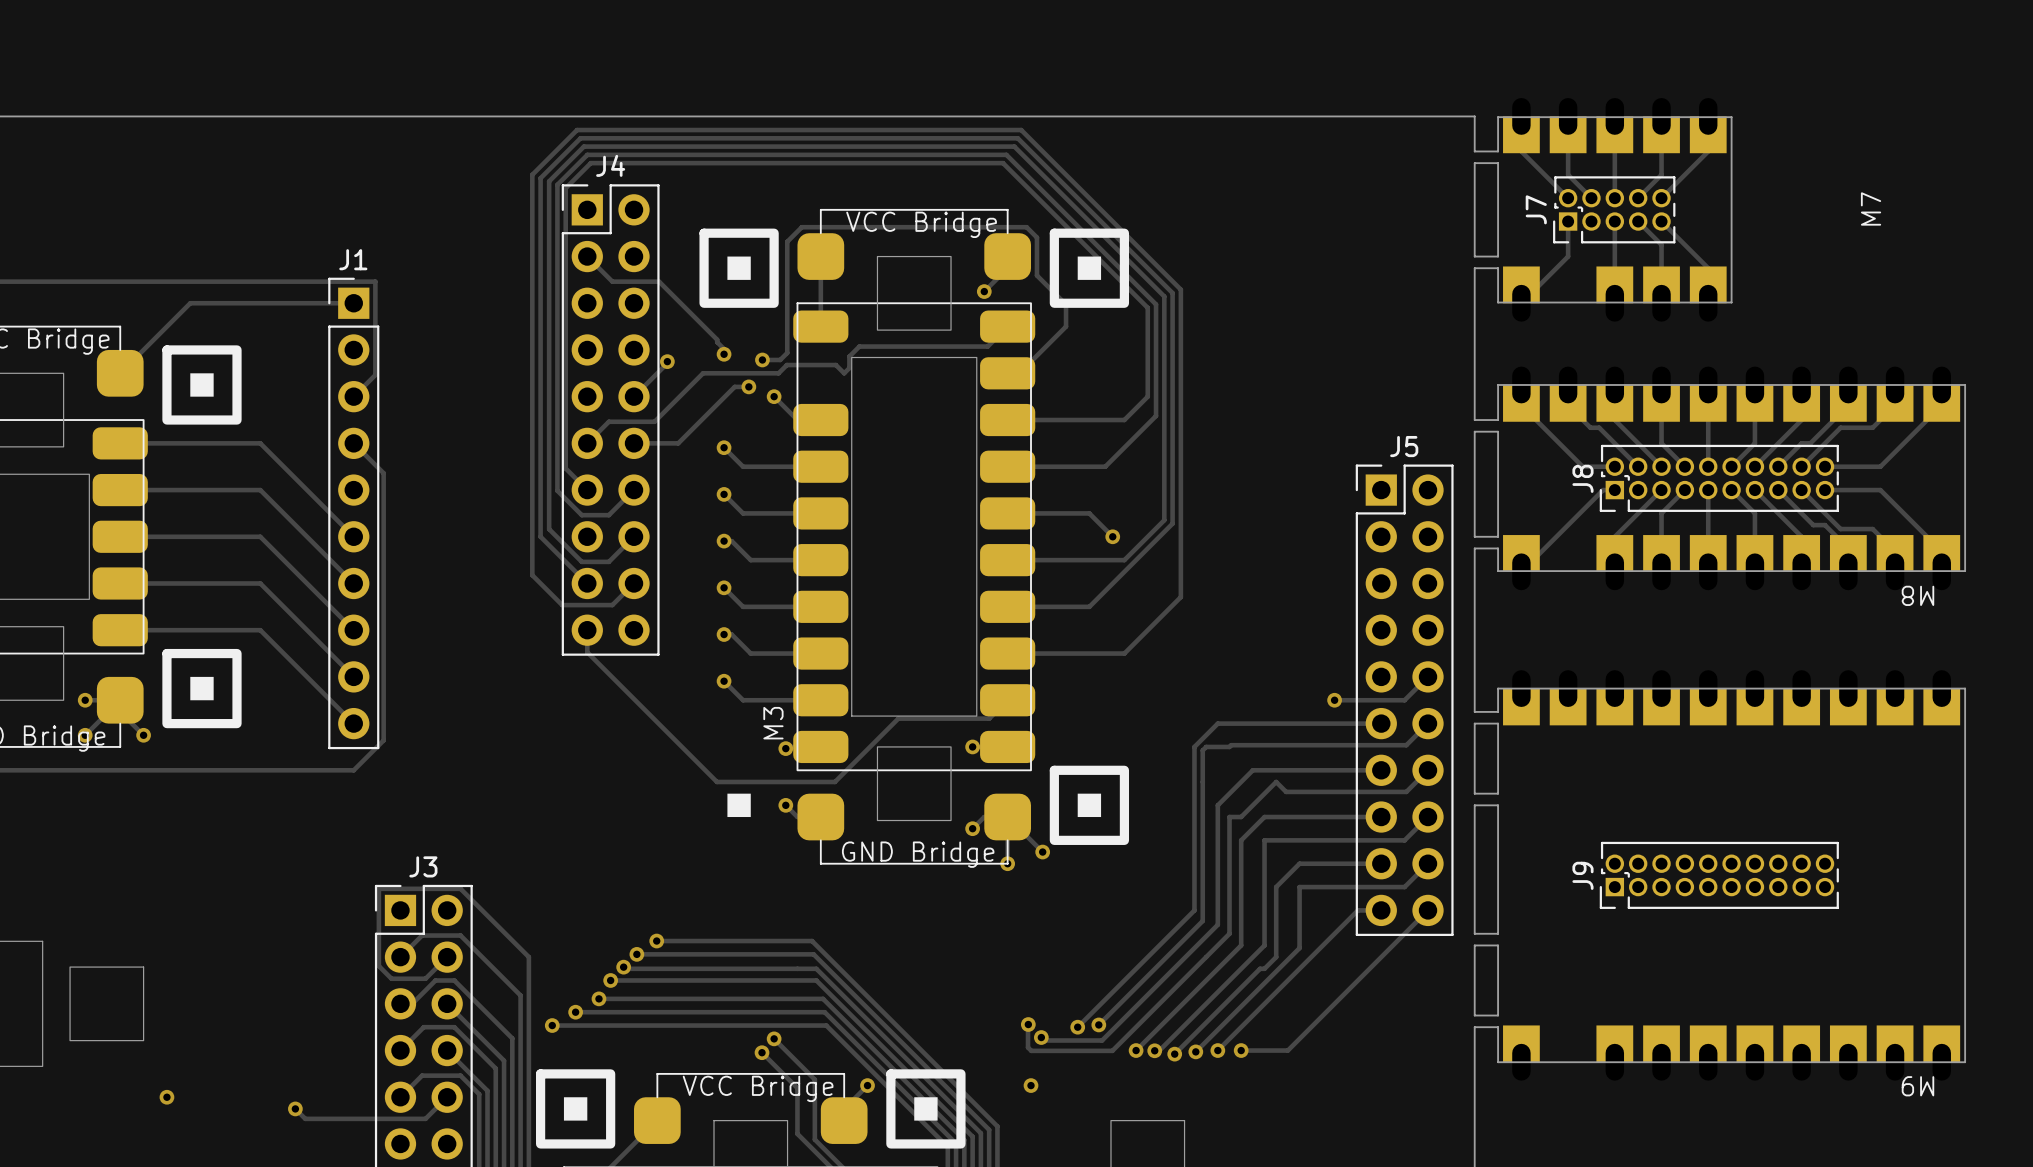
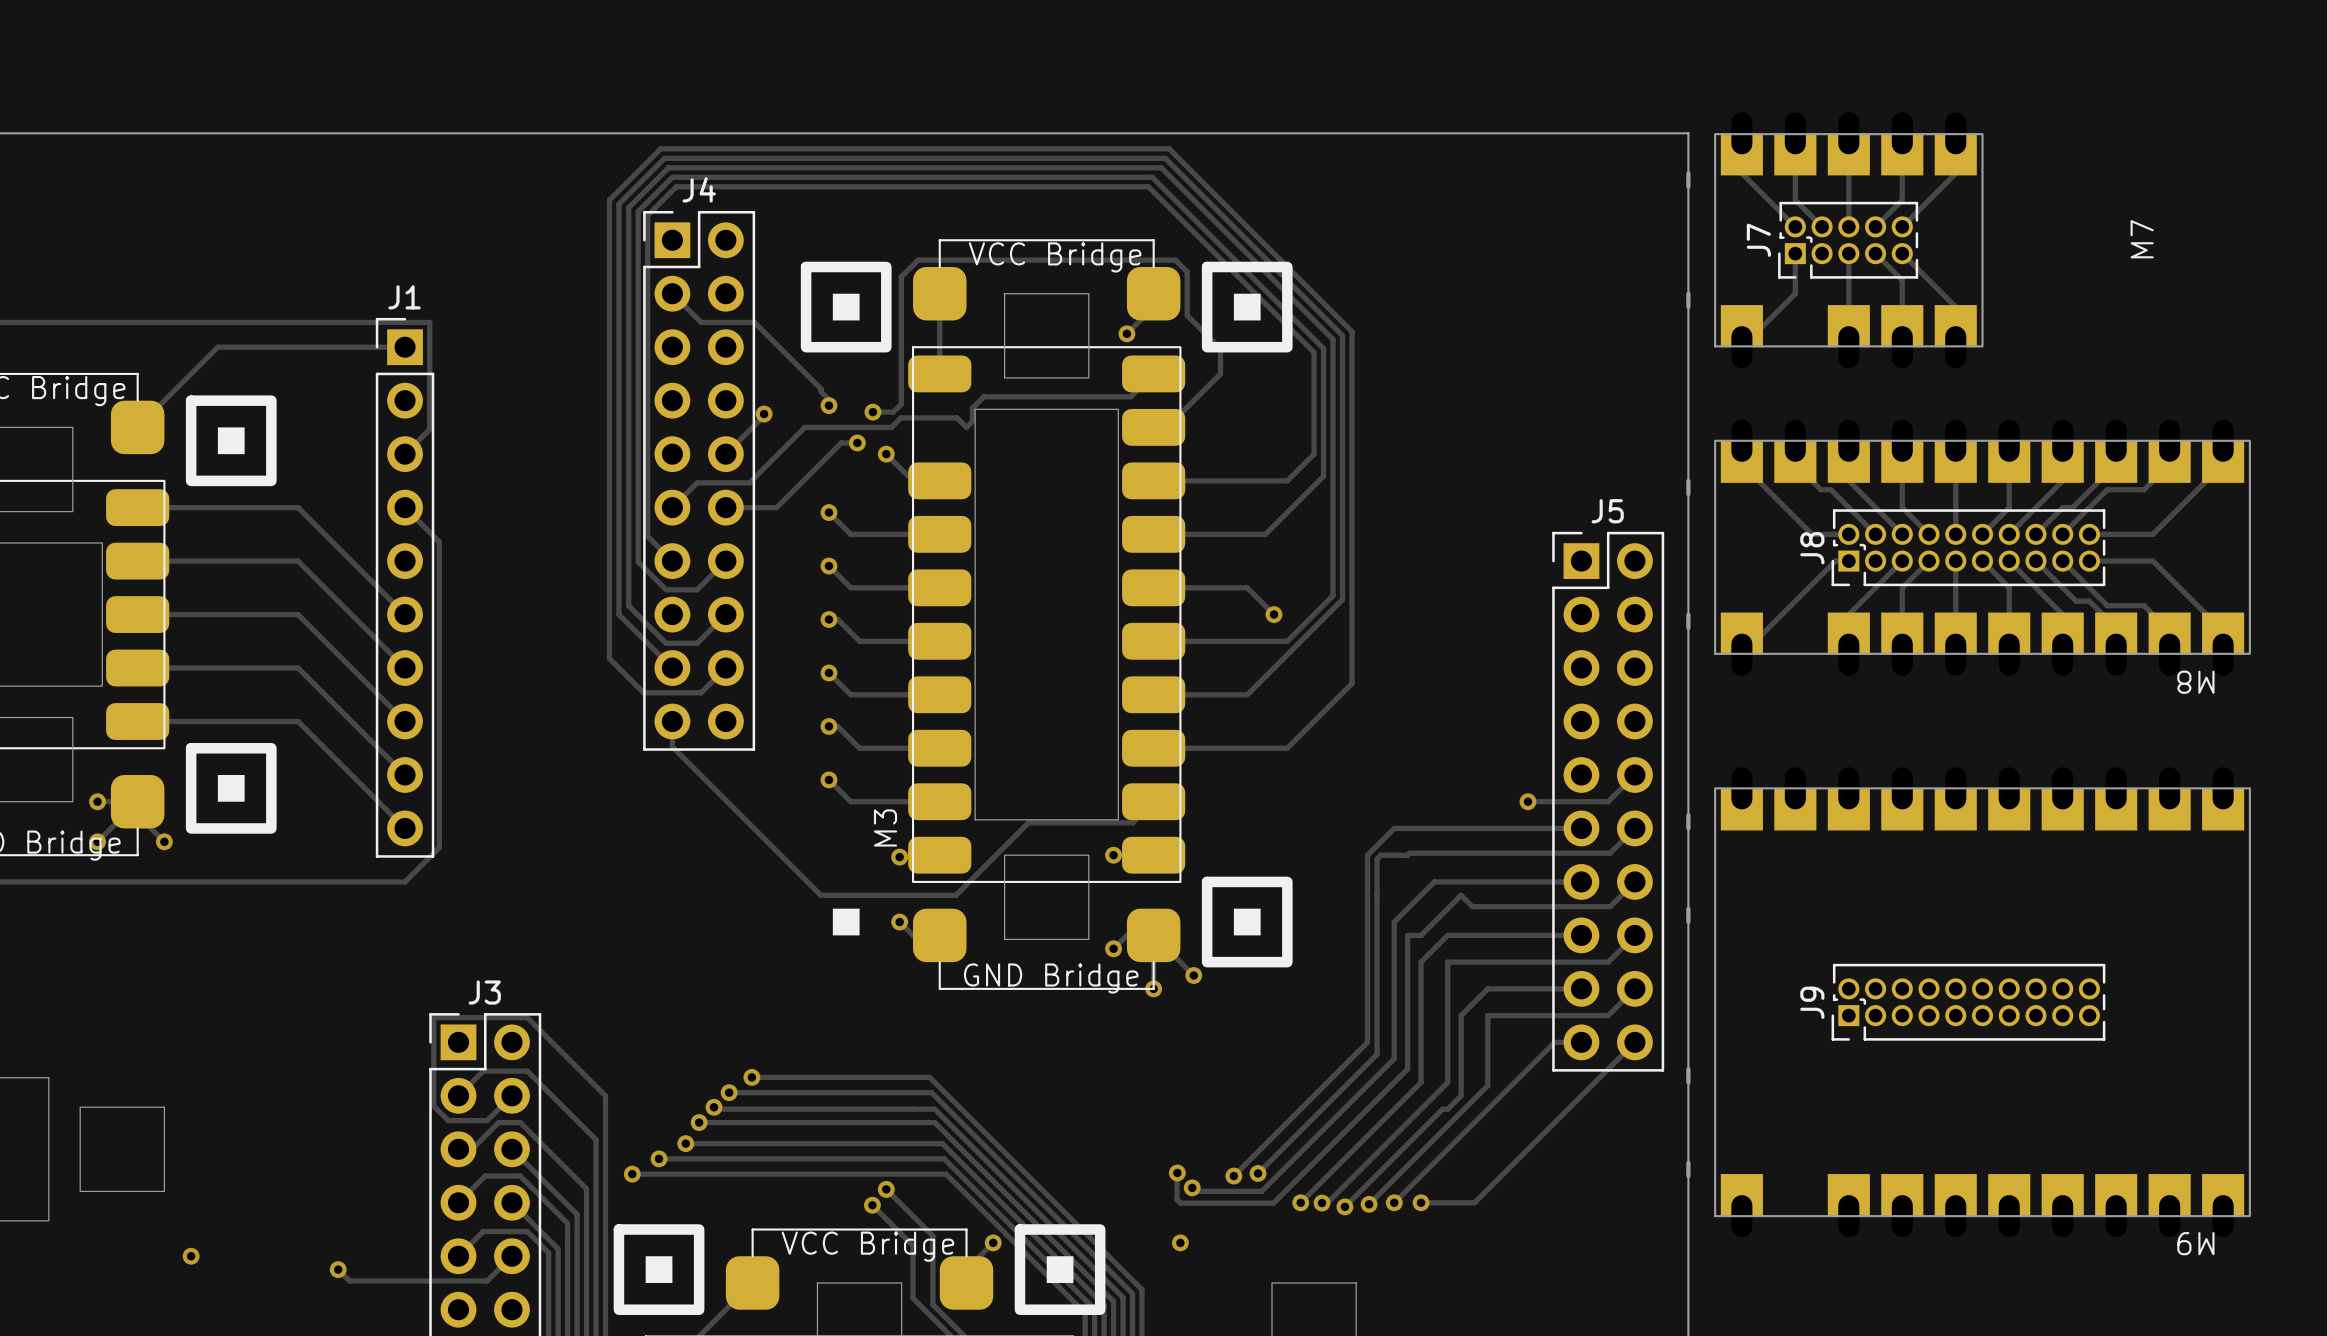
M7 footprint: [1503, 98, 1727, 322] -> [1714, 112, 1984, 369]
board edge: (1474, 151) (1498, 151) (1498, 117) (1731, 117) (1731, 302) (1498, 302) (1498, 268) (1474, 268) -> (1688, 173) (1688, 186)
board edge: (1474, 163) (1498, 163) (1498, 256) (1474, 256) -> (1688, 307) (1688, 293)
M8 footprint: [1503, 366, 1961, 591] -> [1714, 419, 2251, 676]
board edge: (1474, 420) (1498, 420) (1498, 384) (1965, 384) (1965, 571) (1498, 571) (1498, 548) (1474, 548) -> (1688, 480) (1688, 494)
board edge: (1474, 431) (1498, 431) (1498, 536) (1474, 536) -> (1688, 627) (1688, 614)
M9 footprint: [1503, 670, 1961, 1081] -> [1714, 767, 2251, 1238]
board edge: (1474, 711) (1498, 711) (1498, 688) (1965, 688) (1965, 1062) (1498, 1062) (1498, 1027) (1474, 1027) -> (1688, 1162) (1688, 1176)
board edge: (1474, 723) (1498, 723) (1498, 793) (1474, 793) -> (1688, 828) (1688, 815)
board edge: (1474, 805) (1498, 805) (1498, 933) (1474, 933) -> (1688, 922) (1688, 908)
board edge: (1474, 945) (1498, 945) (1498, 1015) (1474, 1015) -> (1688, 1082) (1688, 1069)

